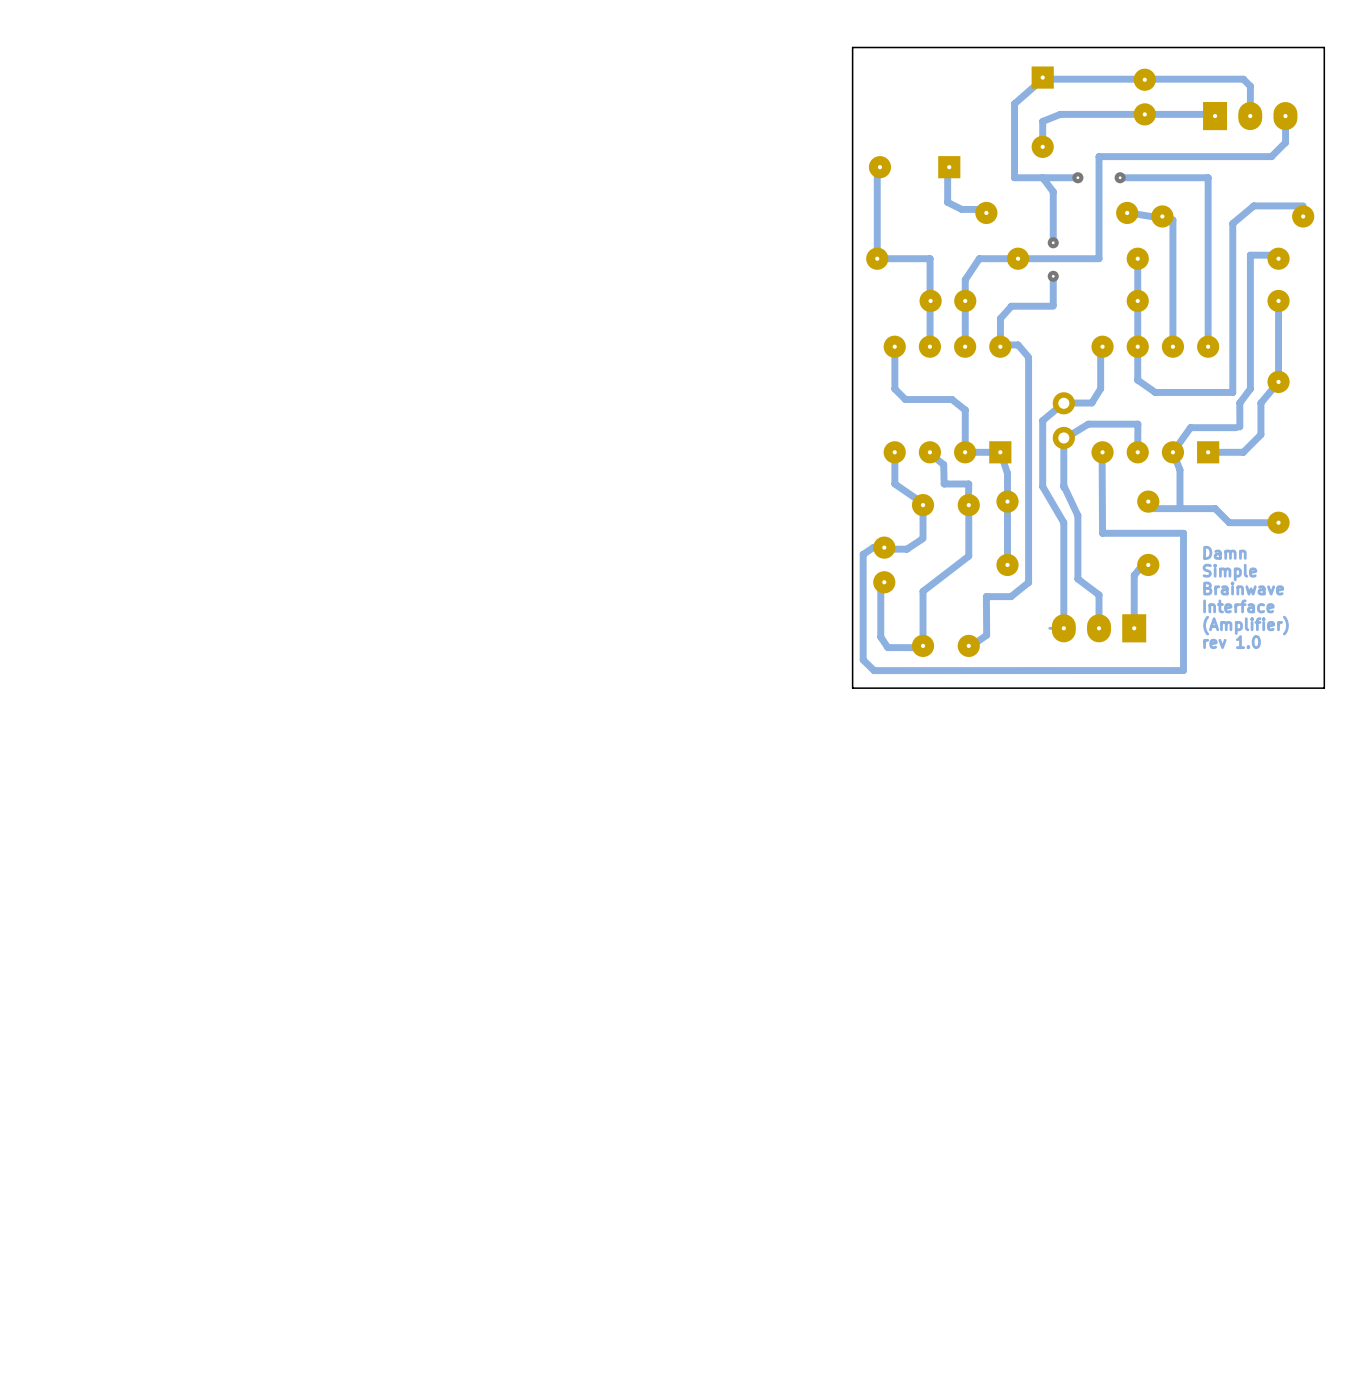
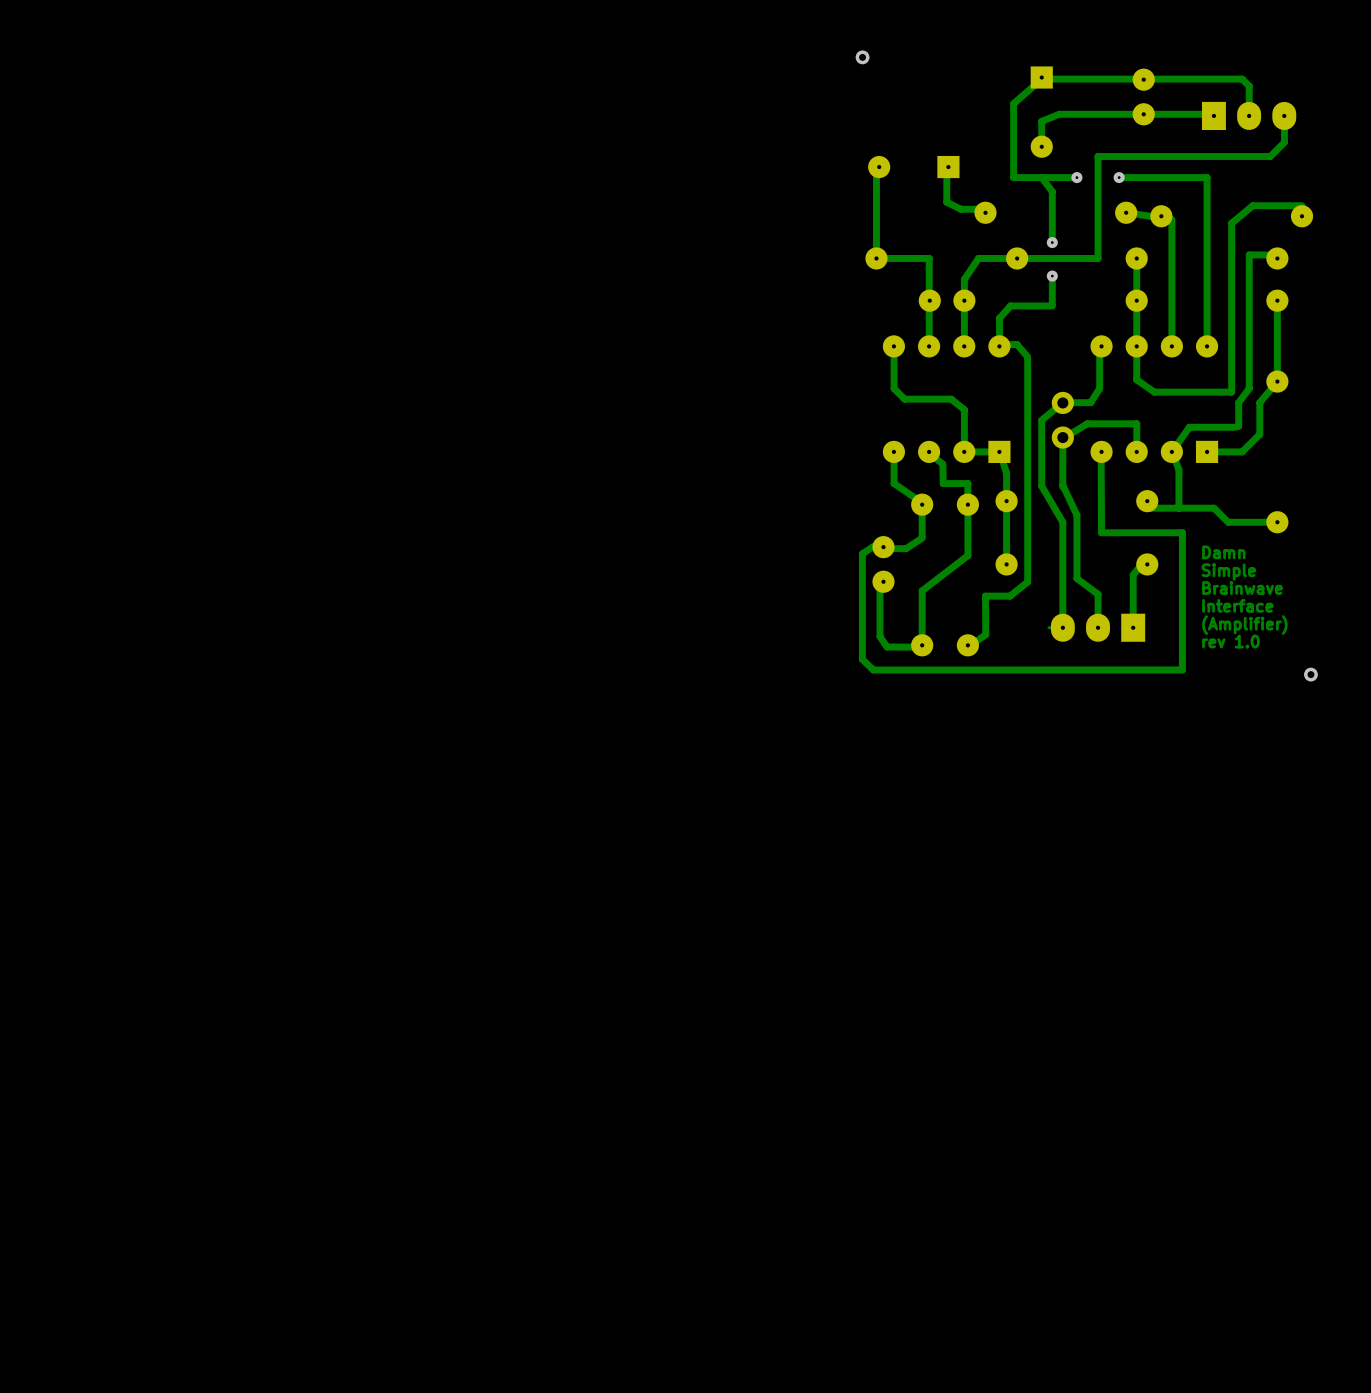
board edge: (1324, 47) (852, 47) (852, 688) (1324, 688) (1324, 47) -> none
via: none -> (862, 57)
via: none -> (1310, 674)

